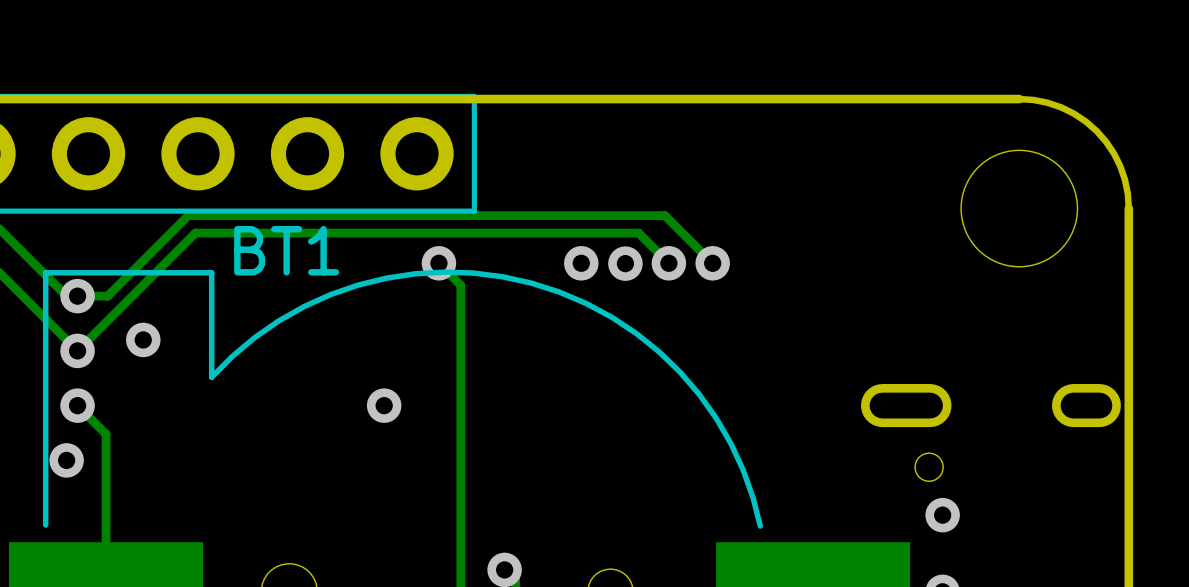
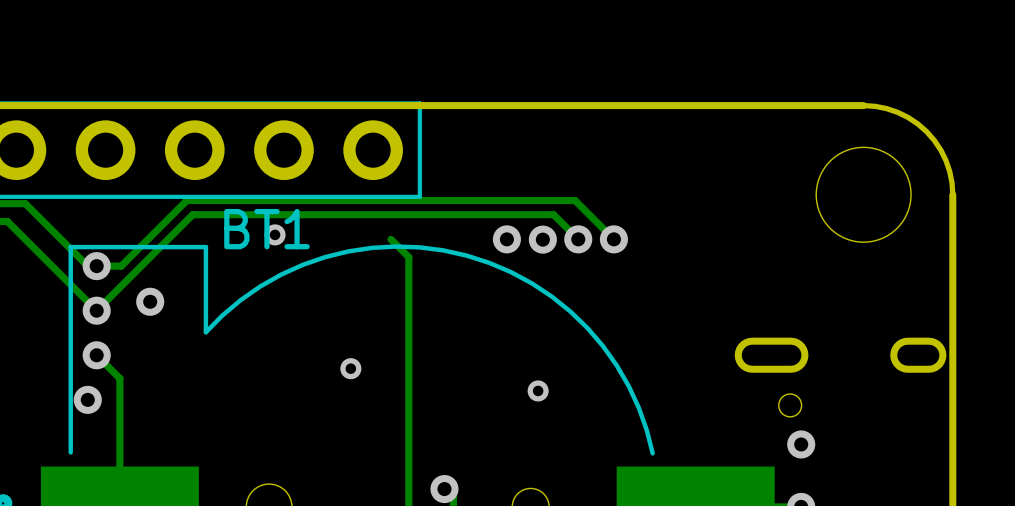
via: none -> (275, 234)
via: (438, 263) -> none
via position: (384, 405) -> (350, 368)
via: none -> (538, 390)

